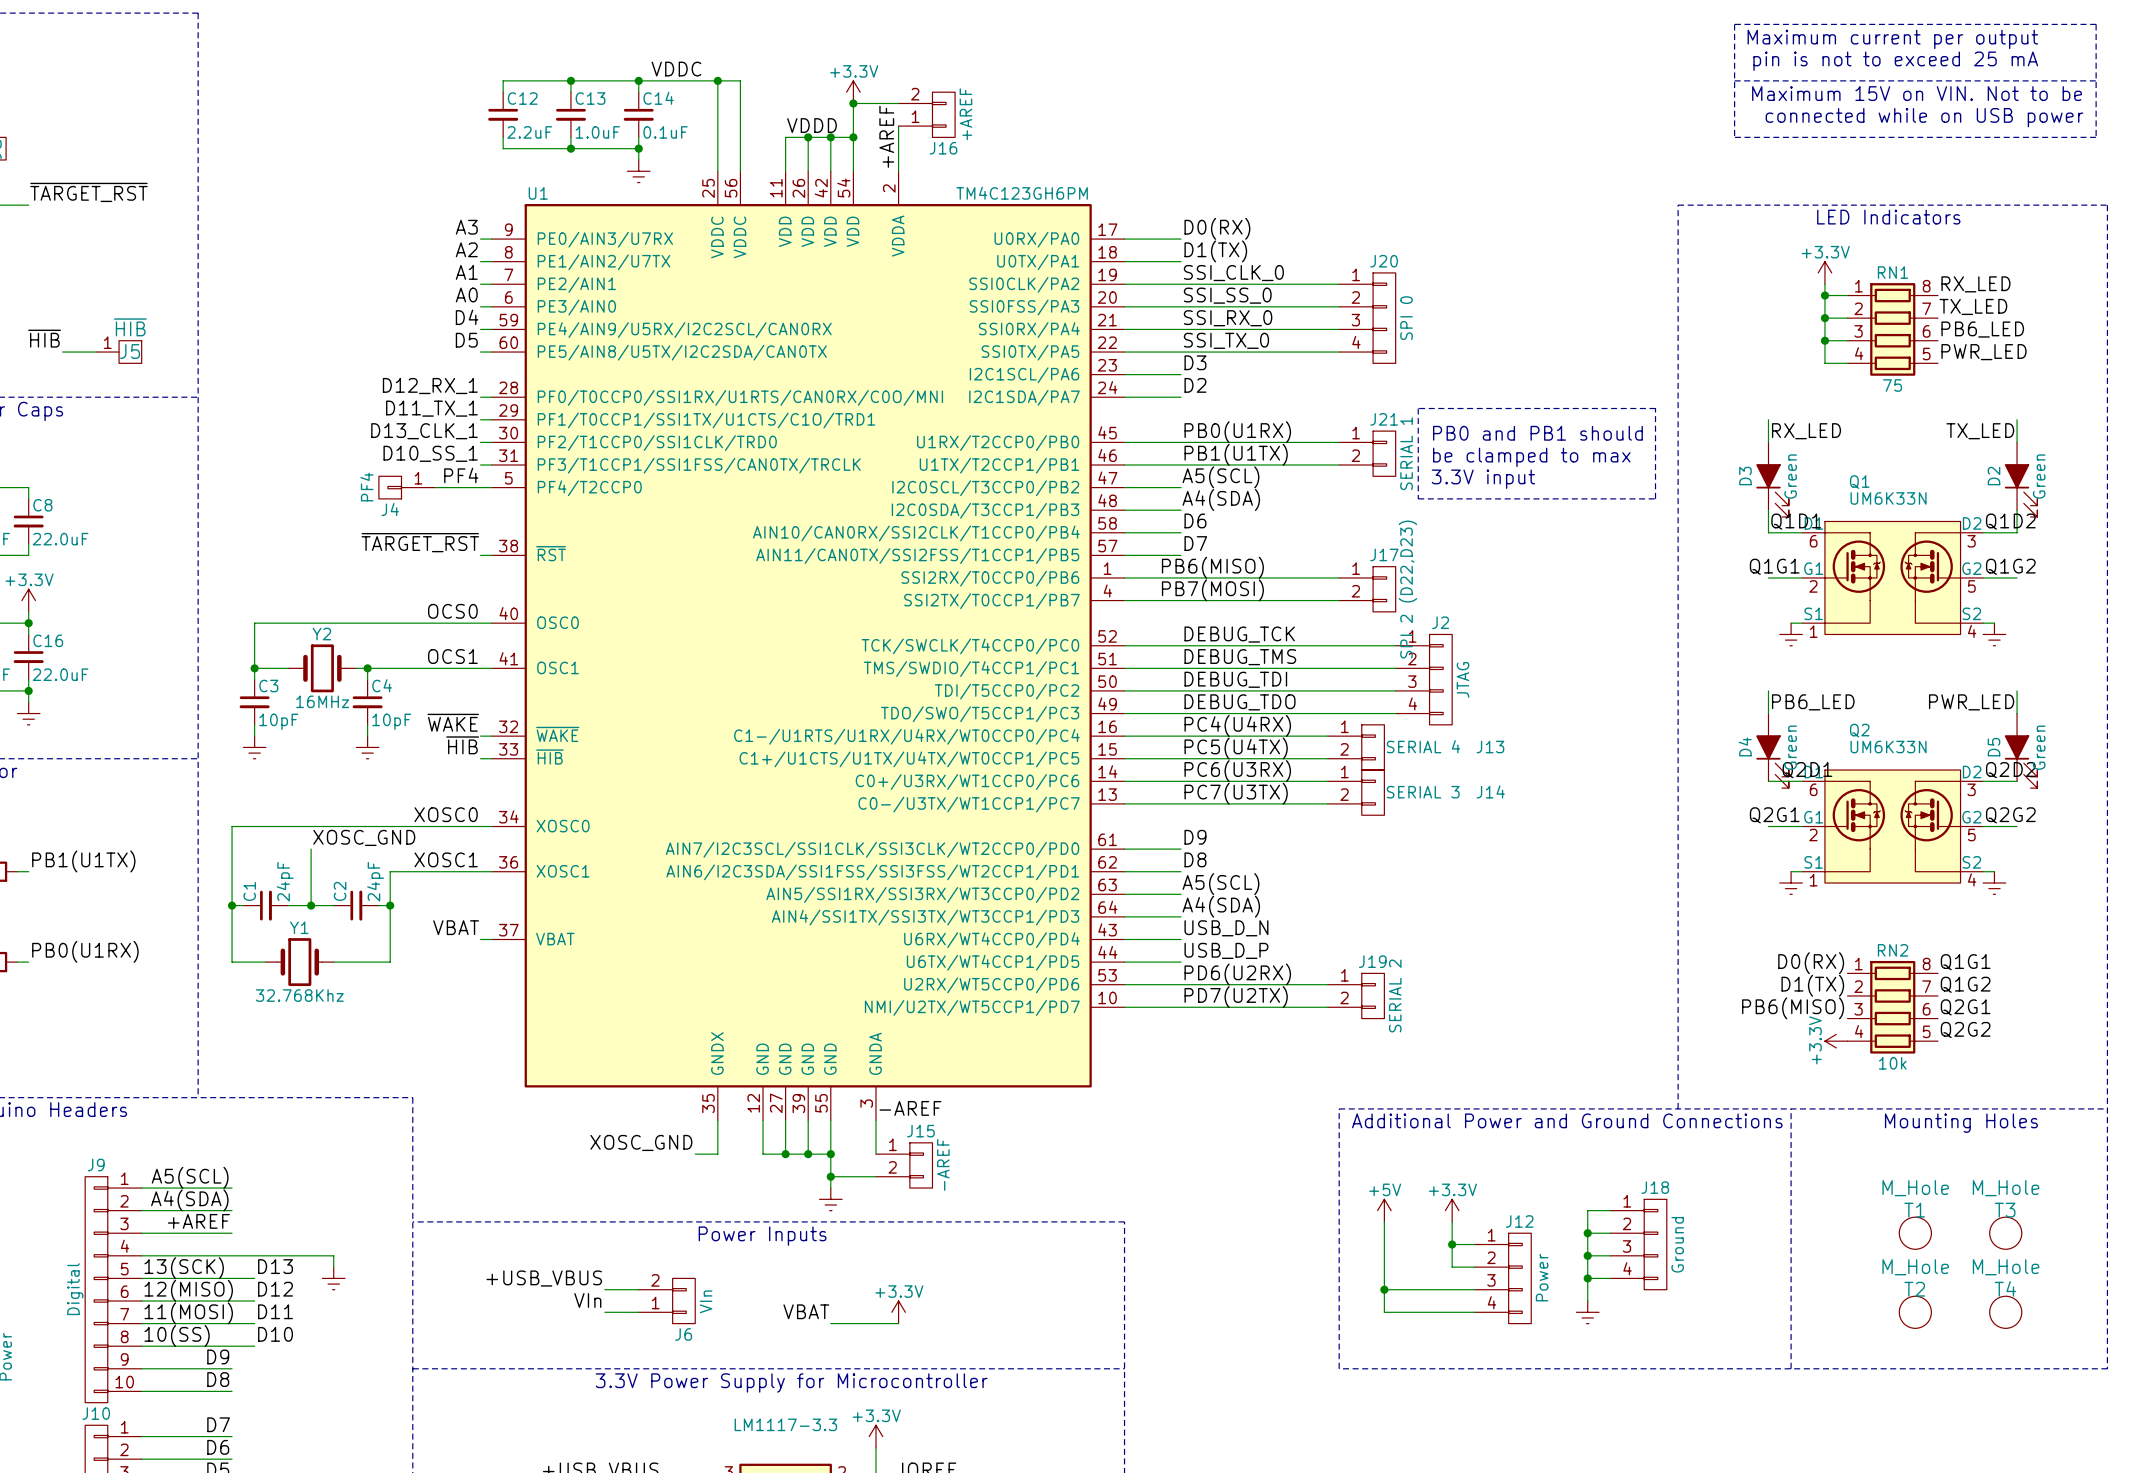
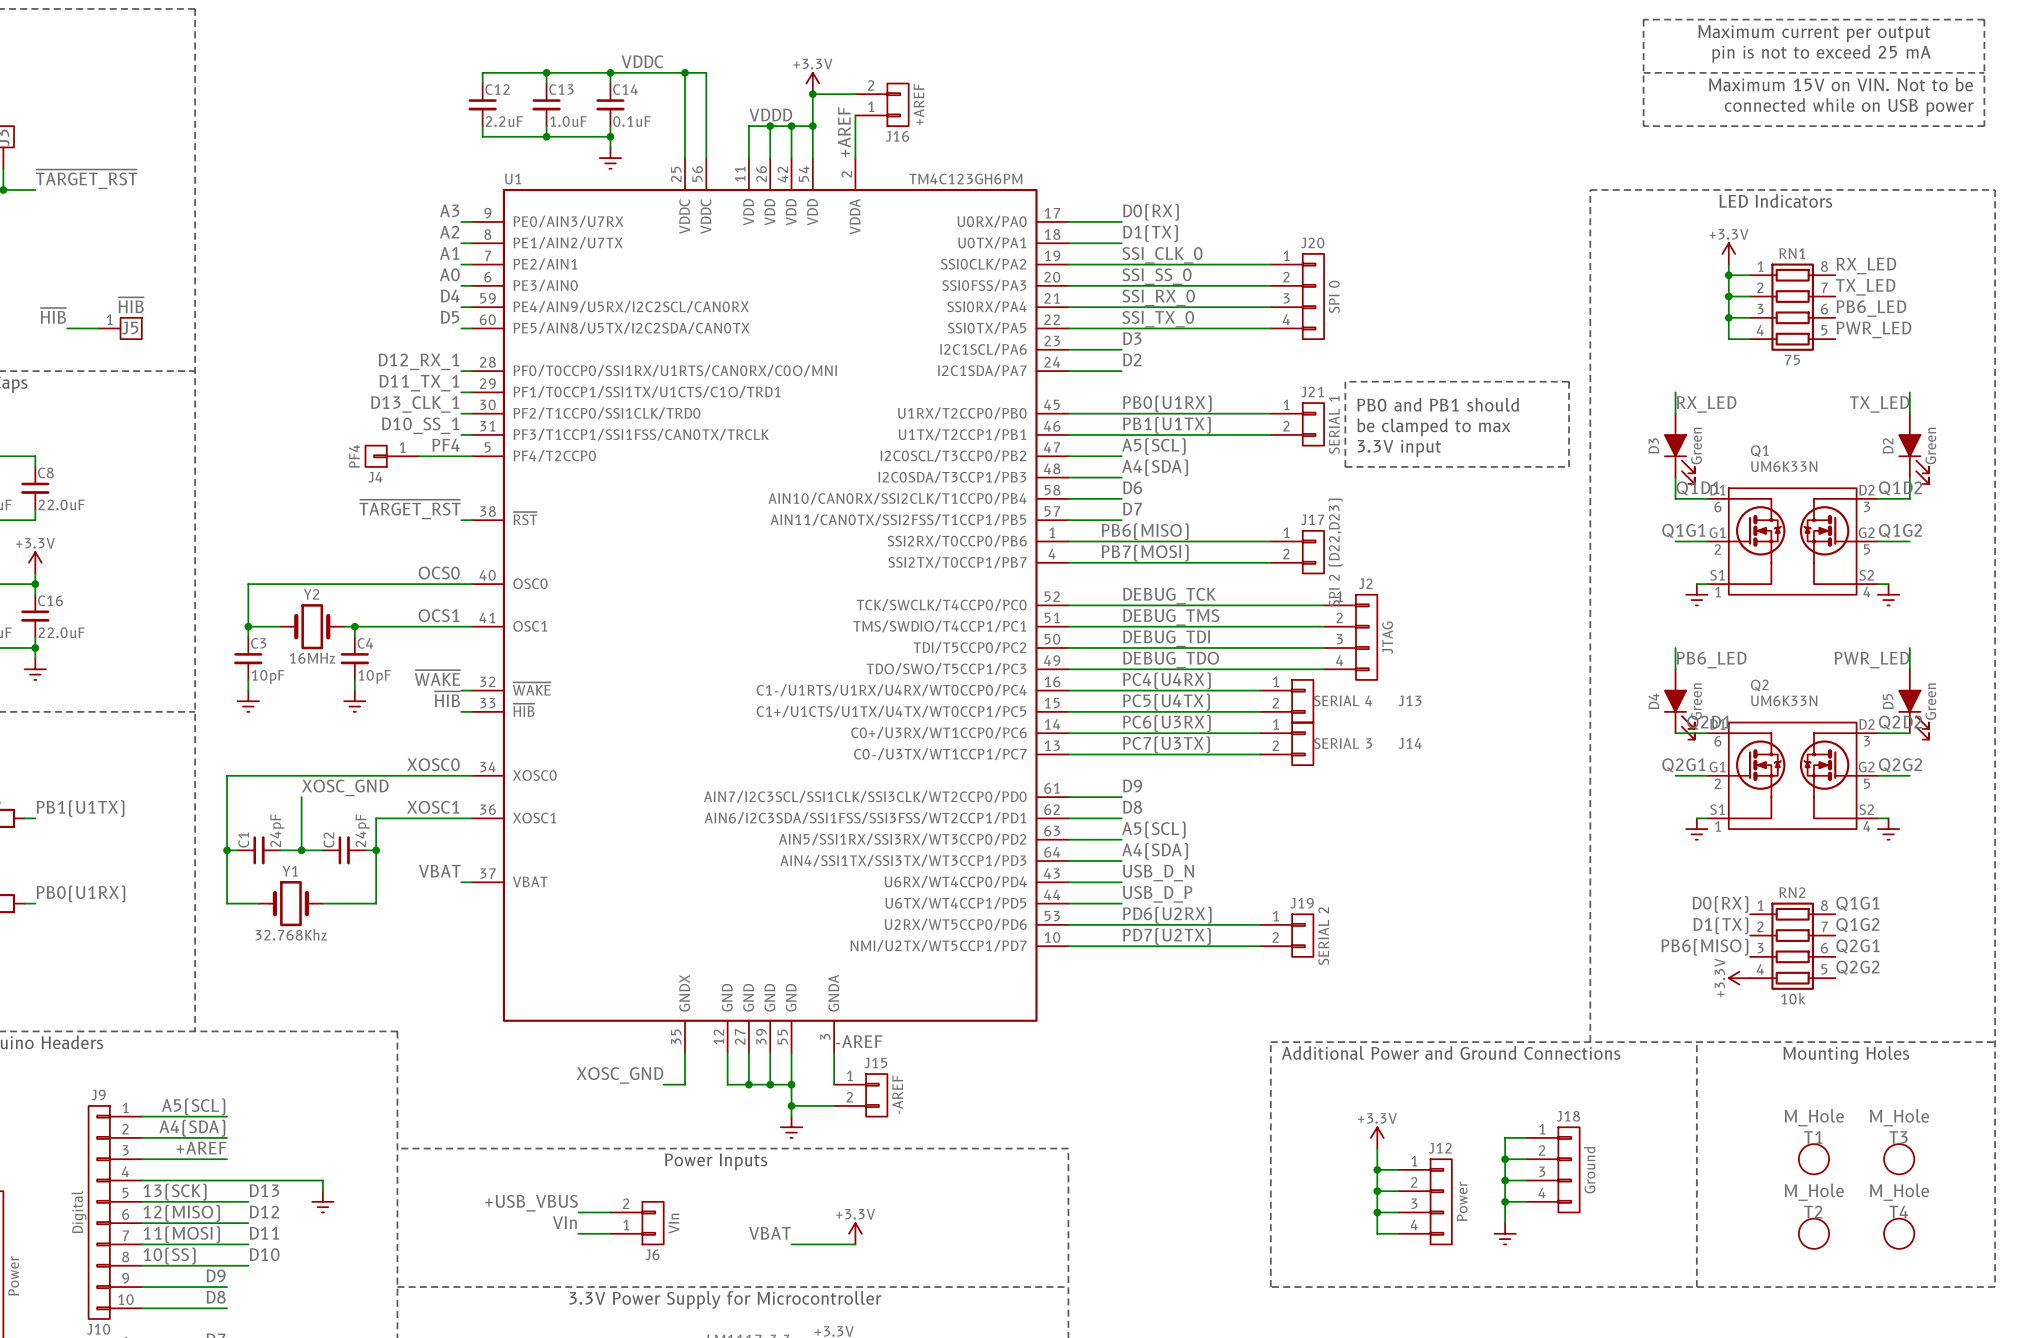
power symbol: +5V (1384, 1210) -> none
wire: (1384, 1221) (1384, 1312) (1452, 1312) -> (1377, 1191) (1377, 1233)
junction: none -> (1377, 1191)
wire: (1384, 1289) (1452, 1289) -> none
junction: (1384, 1289) -> none
junction: none -> (1377, 1212)

